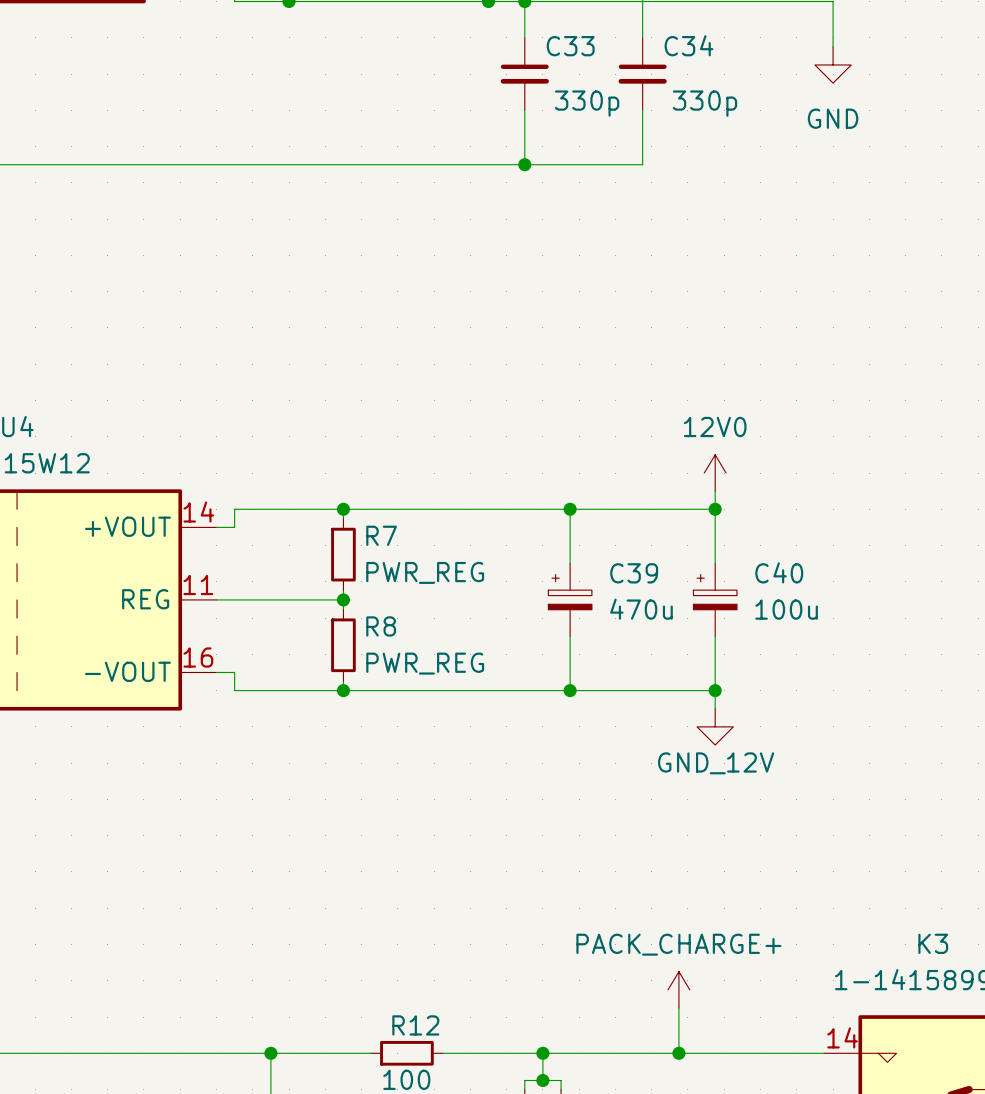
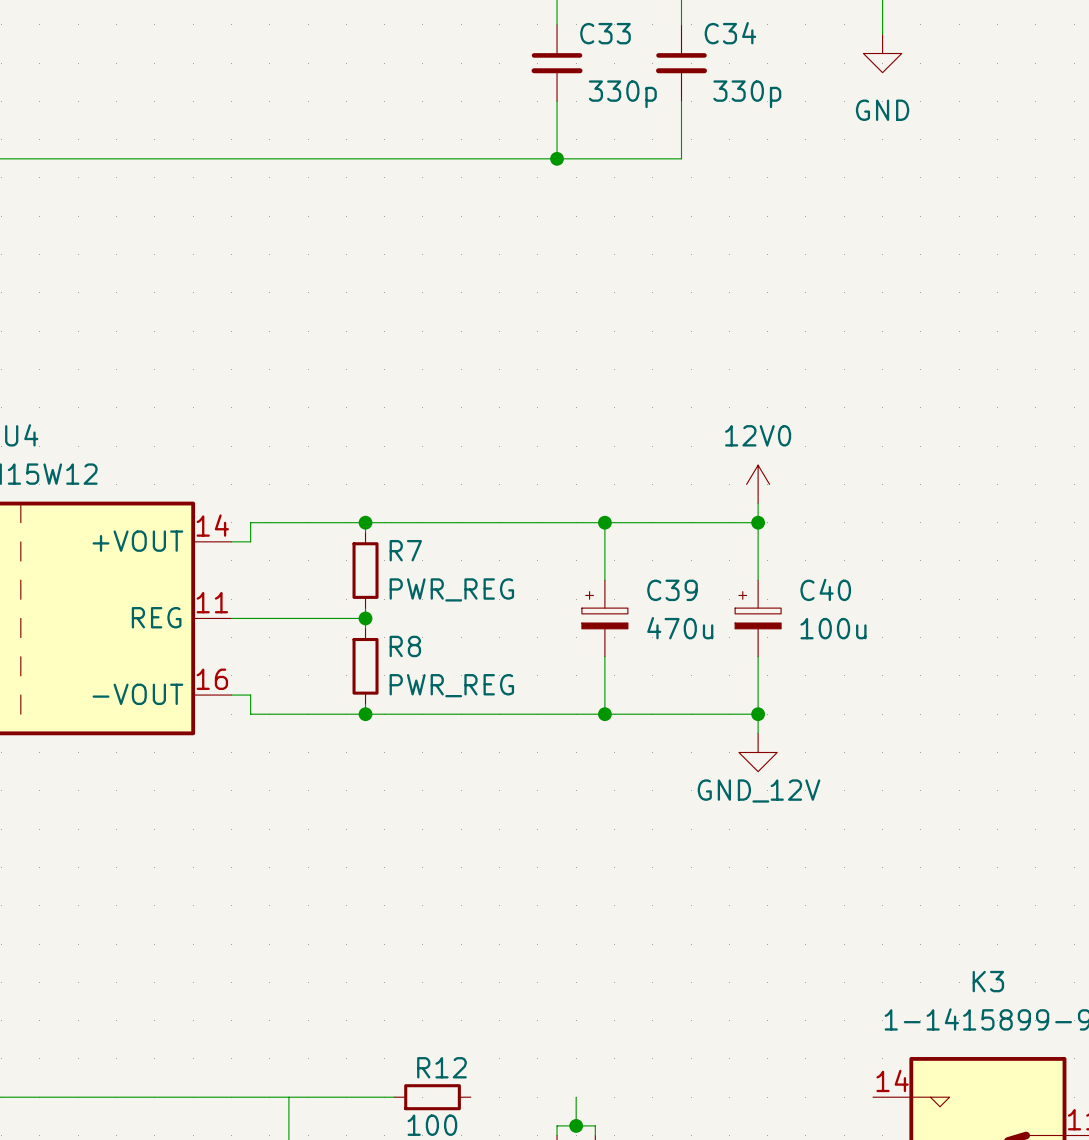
power symbol: PACK_CHARGE+ (678, 989) -> none
wire: (678, 1007) (678, 1053) -> none
junction: (270, 1053) -> none
wire: (443, 1053) (824, 1053) -> none
junction: (542, 1053) -> none
junction: (678, 1053) -> none

